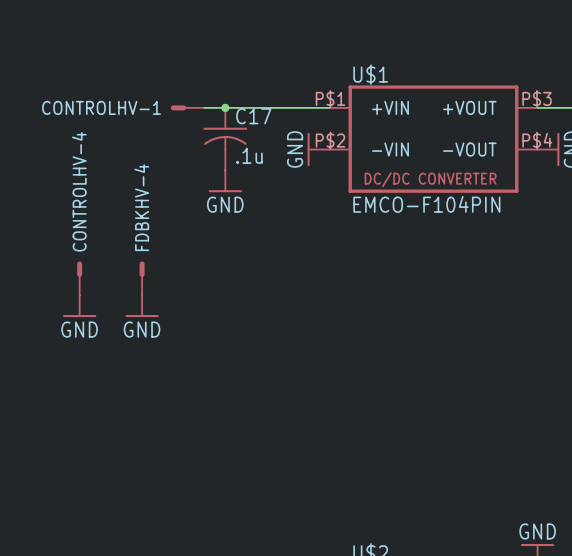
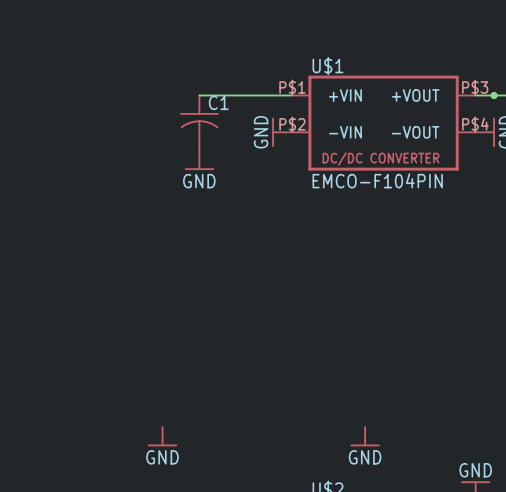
CONTROLHV-1: (187, 107) -> none
wire: (204, 107) (225, 107) -> none
junction: (225, 107) -> none
junction: none -> (494, 95)
C17 name: C17 (253, 116) -> C1 (218, 102)
C17 value: .1u (249, 155) -> none
CONTROLHV-4: (79, 278) -> none
FDBKHV-4: (142, 278) -> none
power symbol: GND (79, 306) -> none
power symbol: GND (142, 306) -> none
power symbol: none -> GND (162, 436)
power symbol: none -> GND (365, 436)

